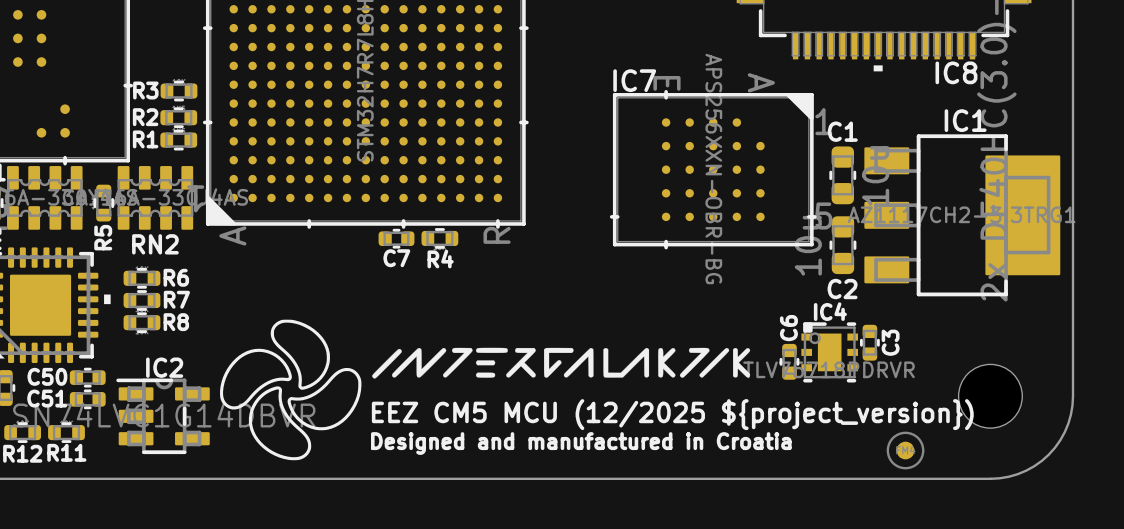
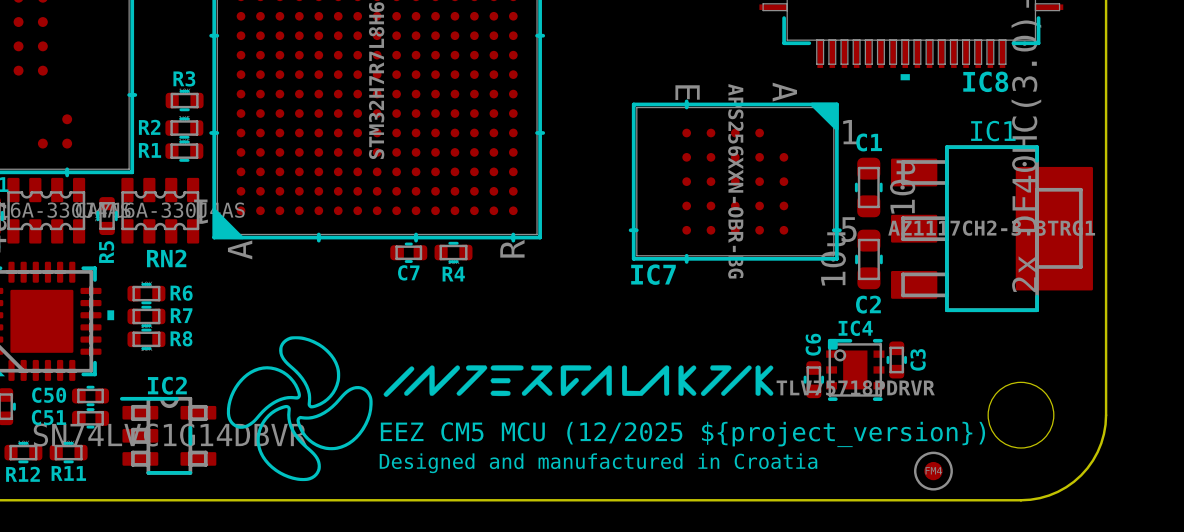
IC7 name position: IC7 (634, 80) -> IC7 (653, 274)
R3 name position: R3 (145, 90) -> R3 (184, 78)

